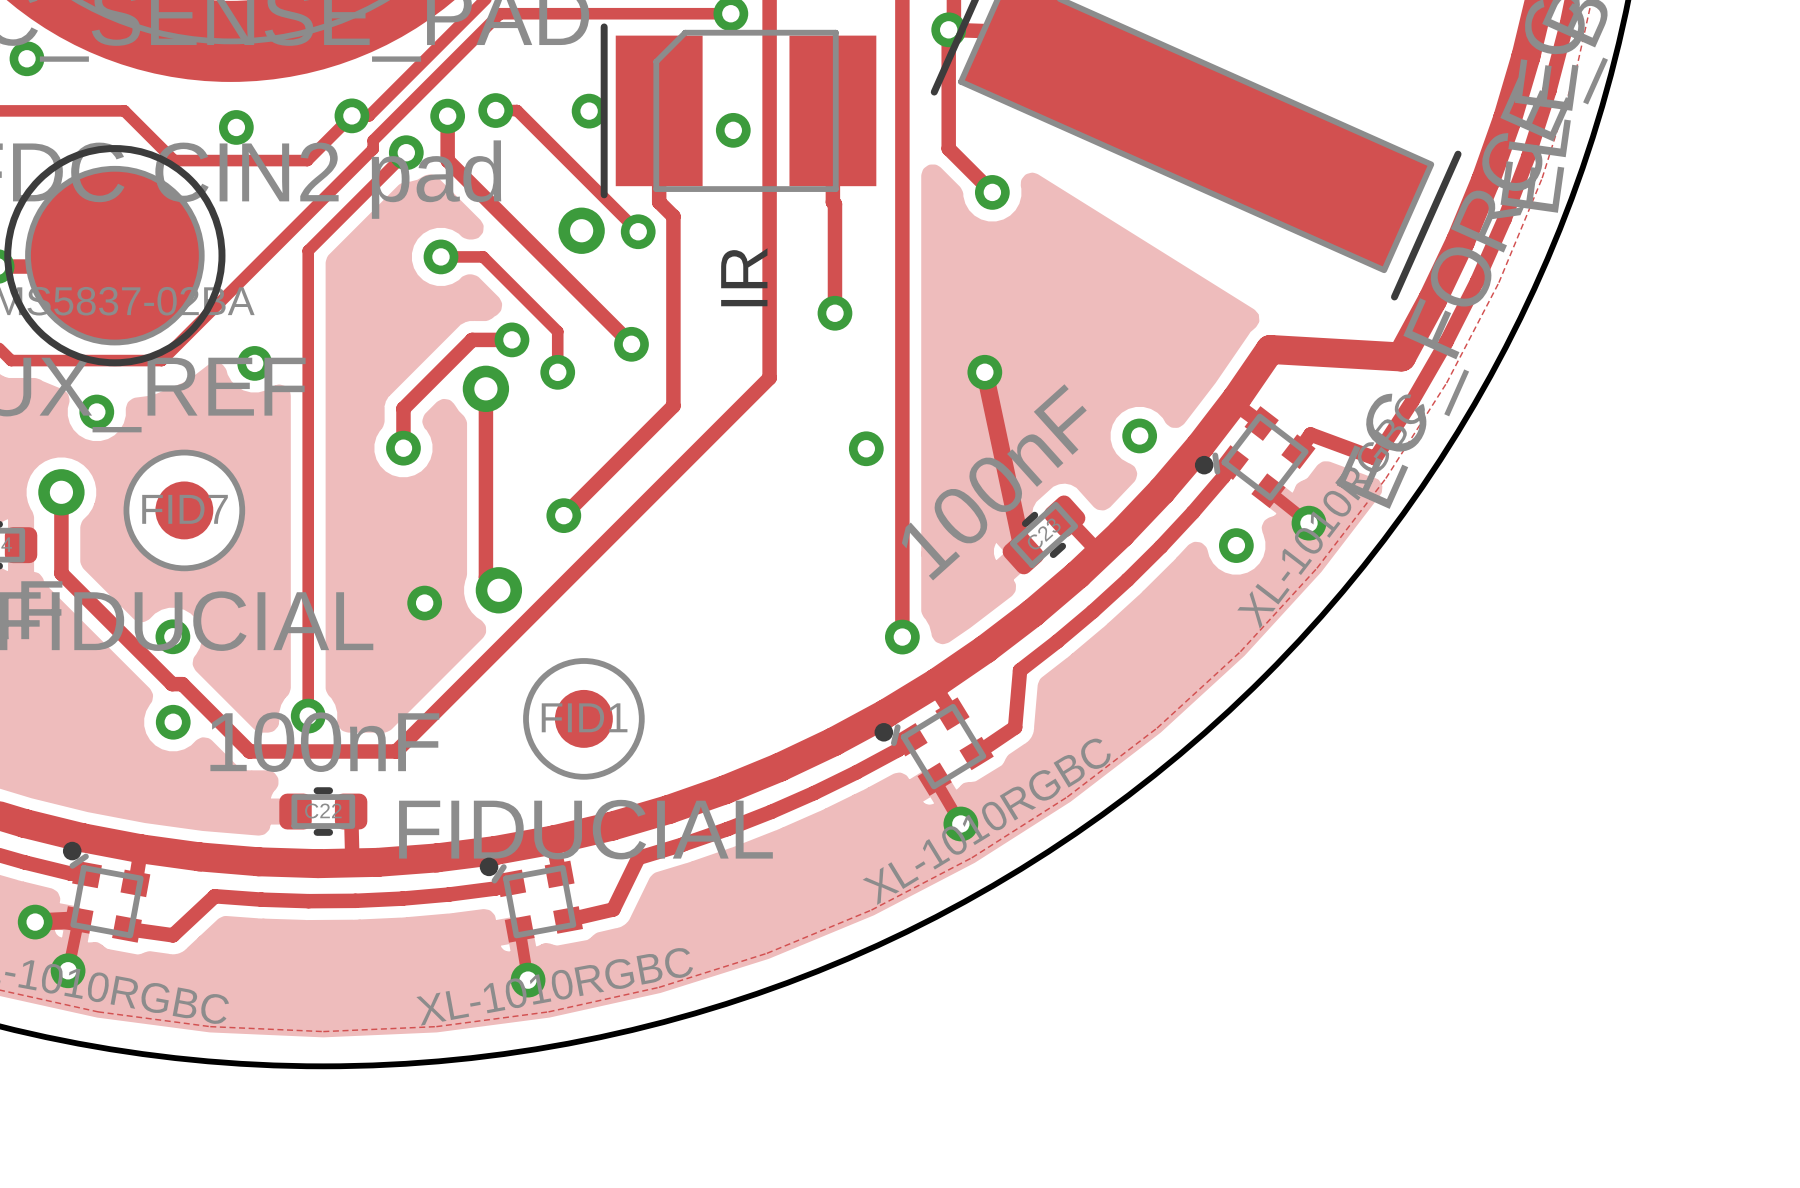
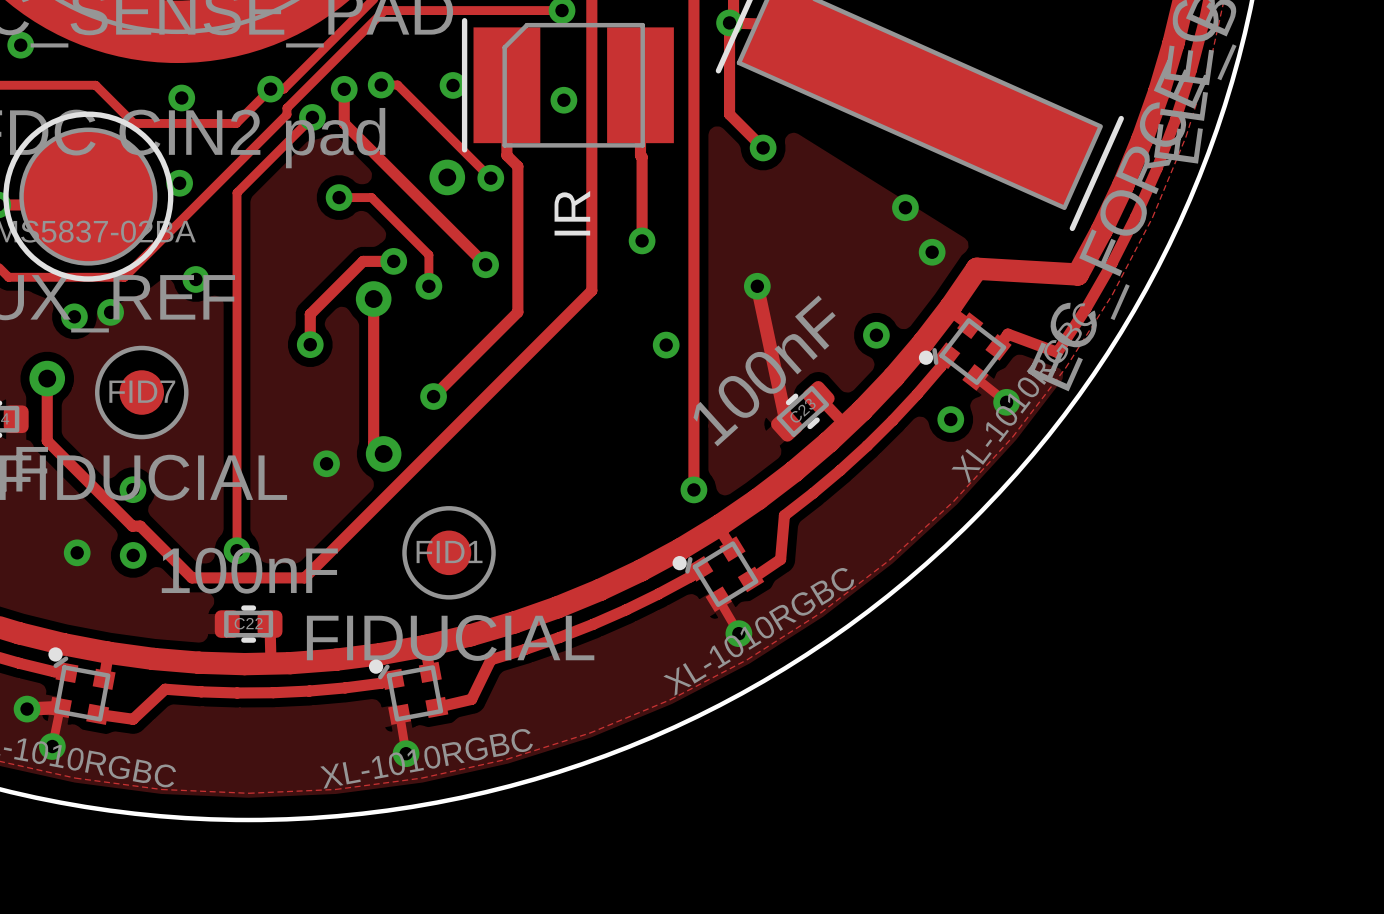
via: none -> (179, 183)
via: none -> (905, 207)
via: none -> (932, 252)
via: none -> (110, 312)
via: none -> (77, 552)

